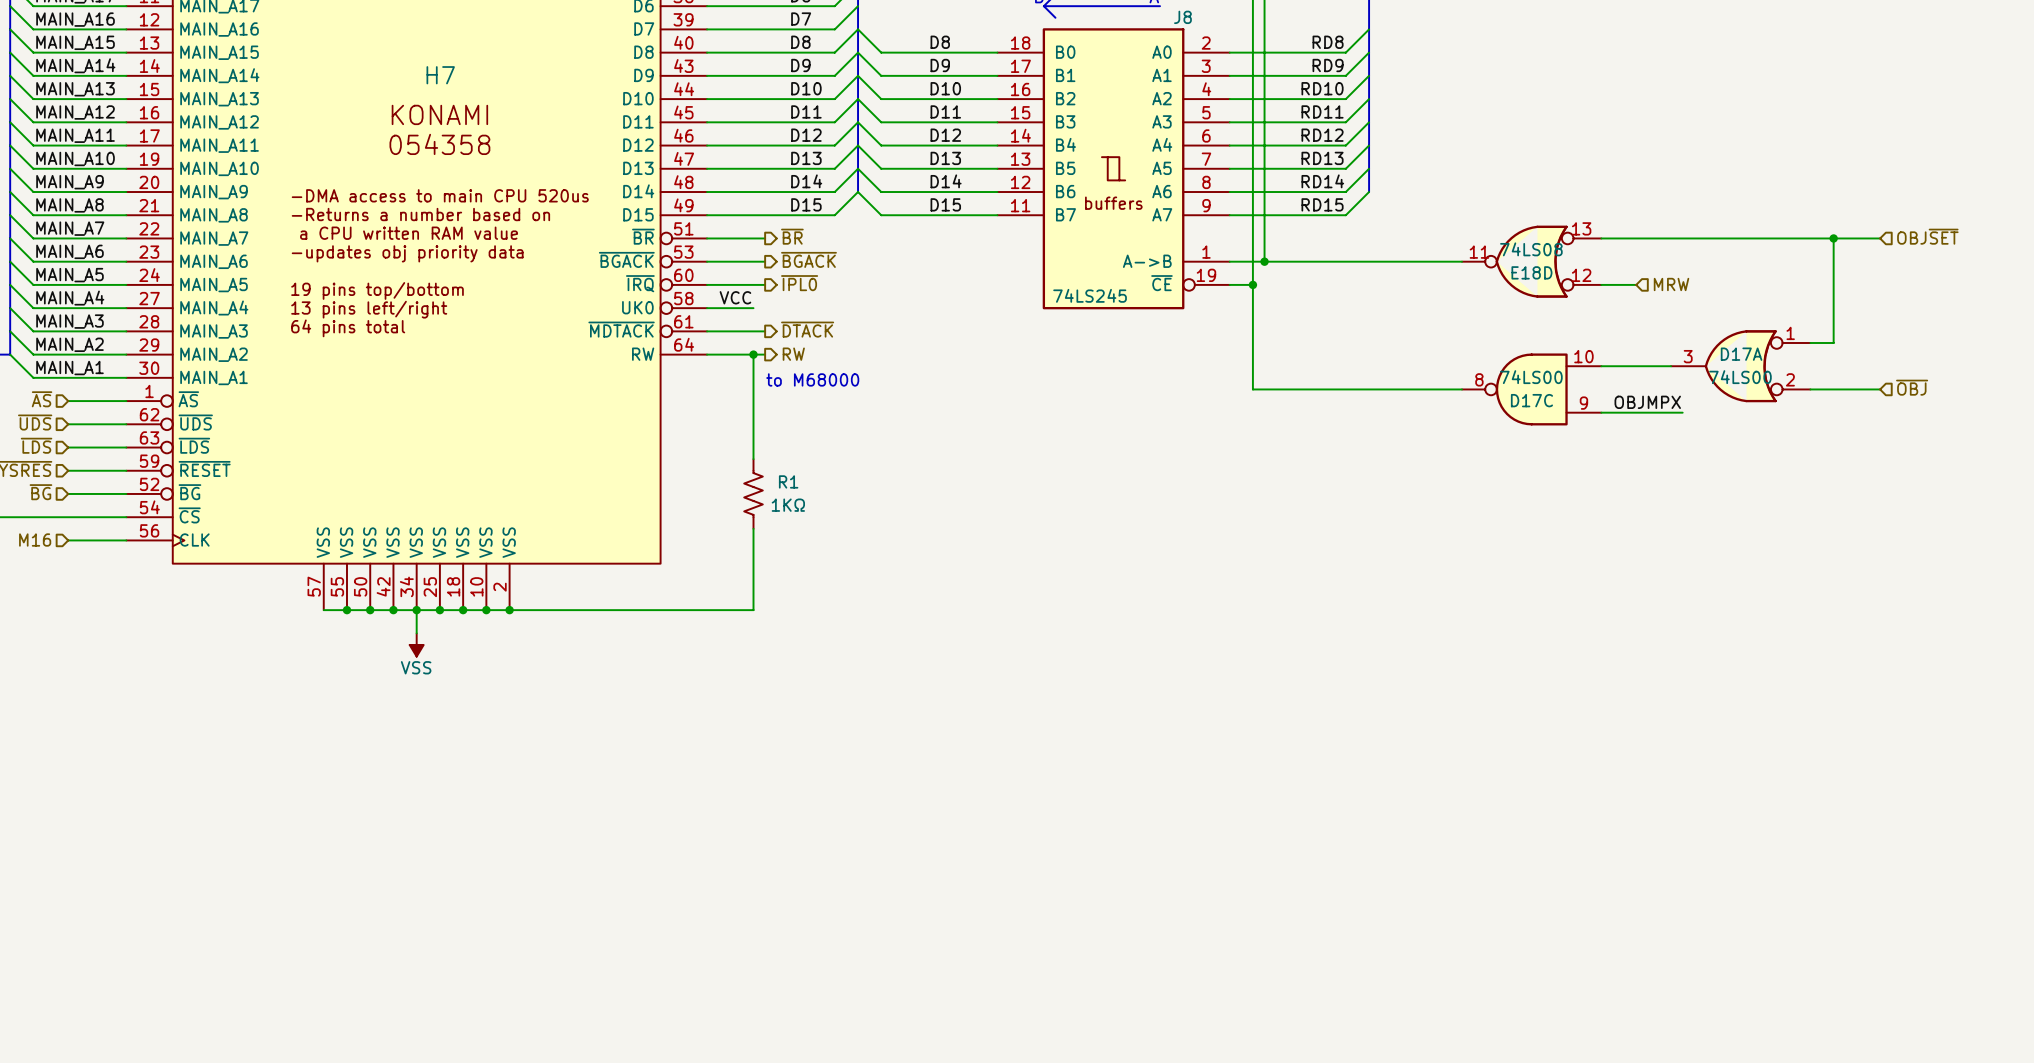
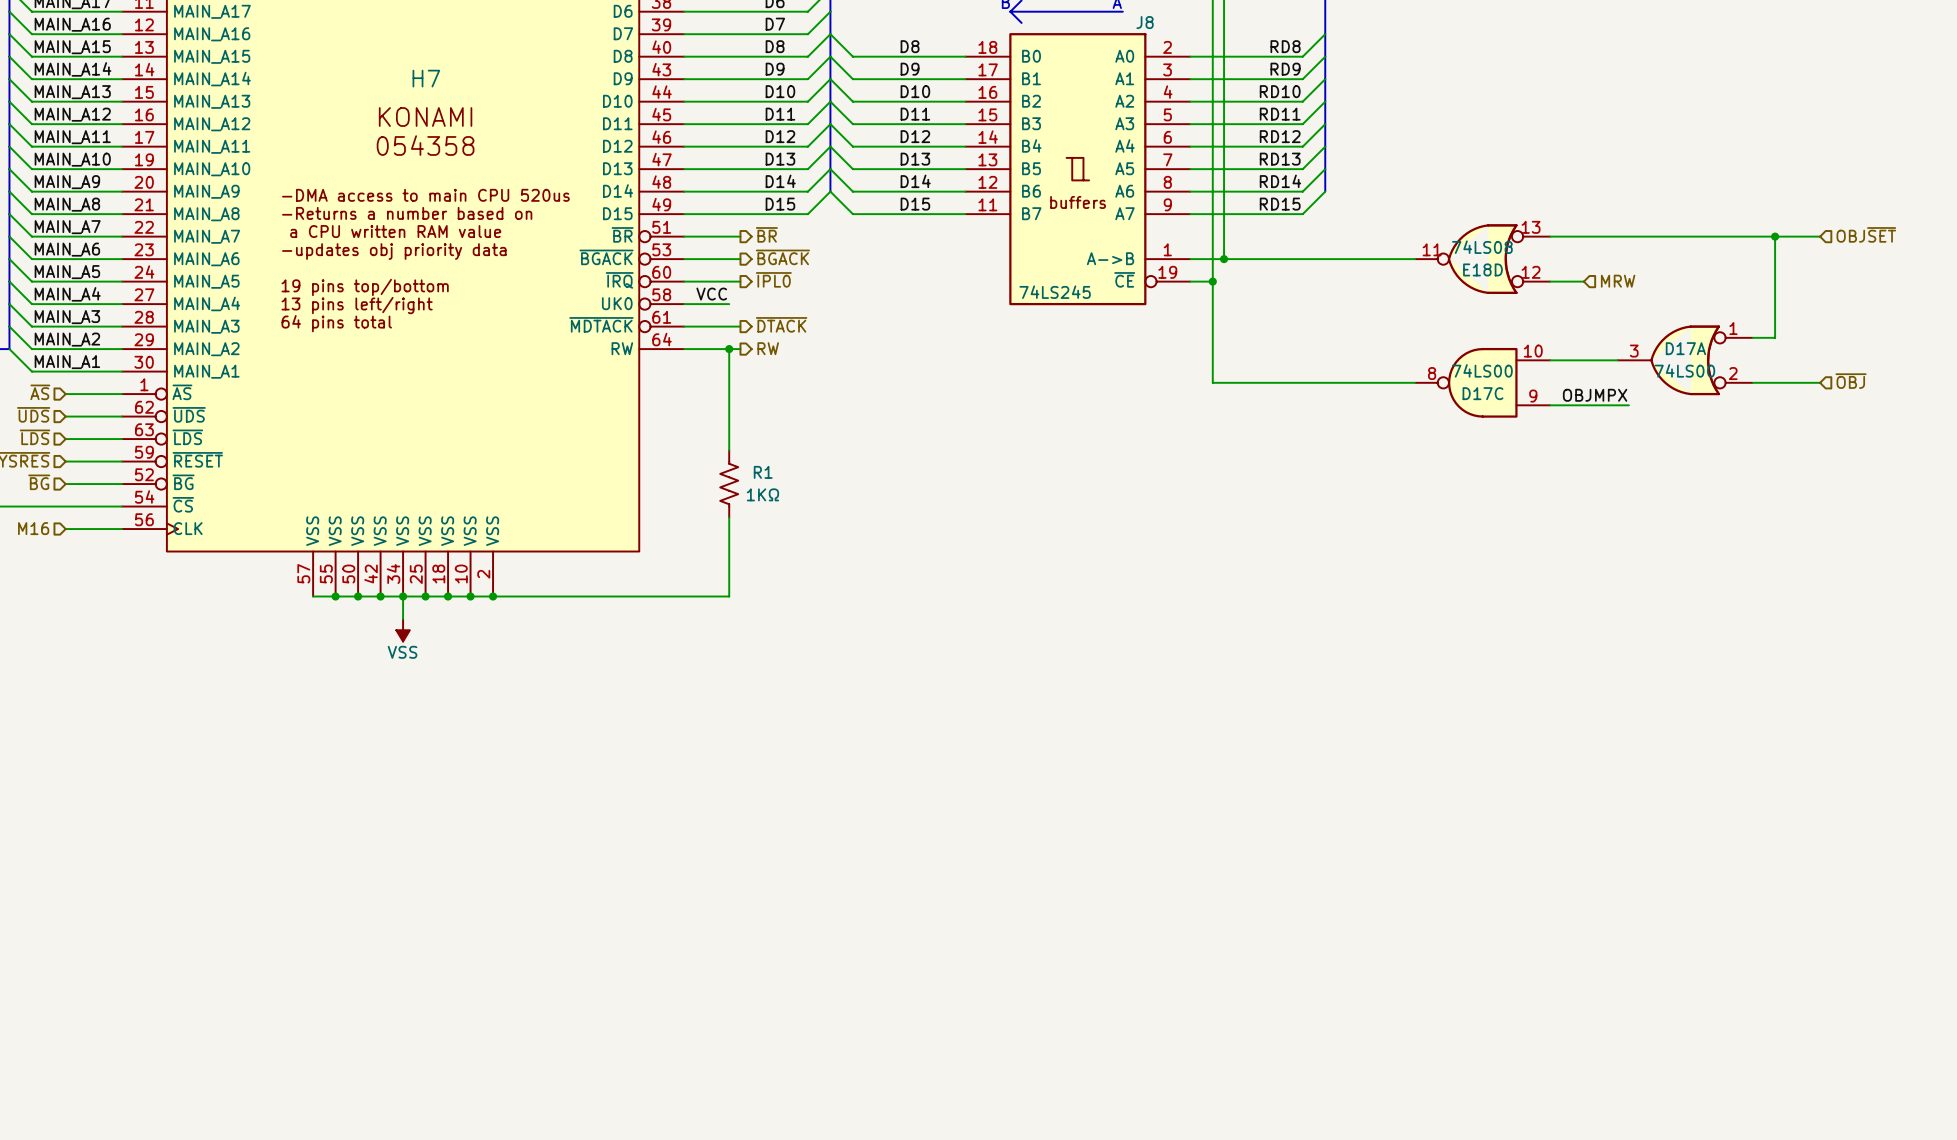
text: to M68000 (812, 379) -> none

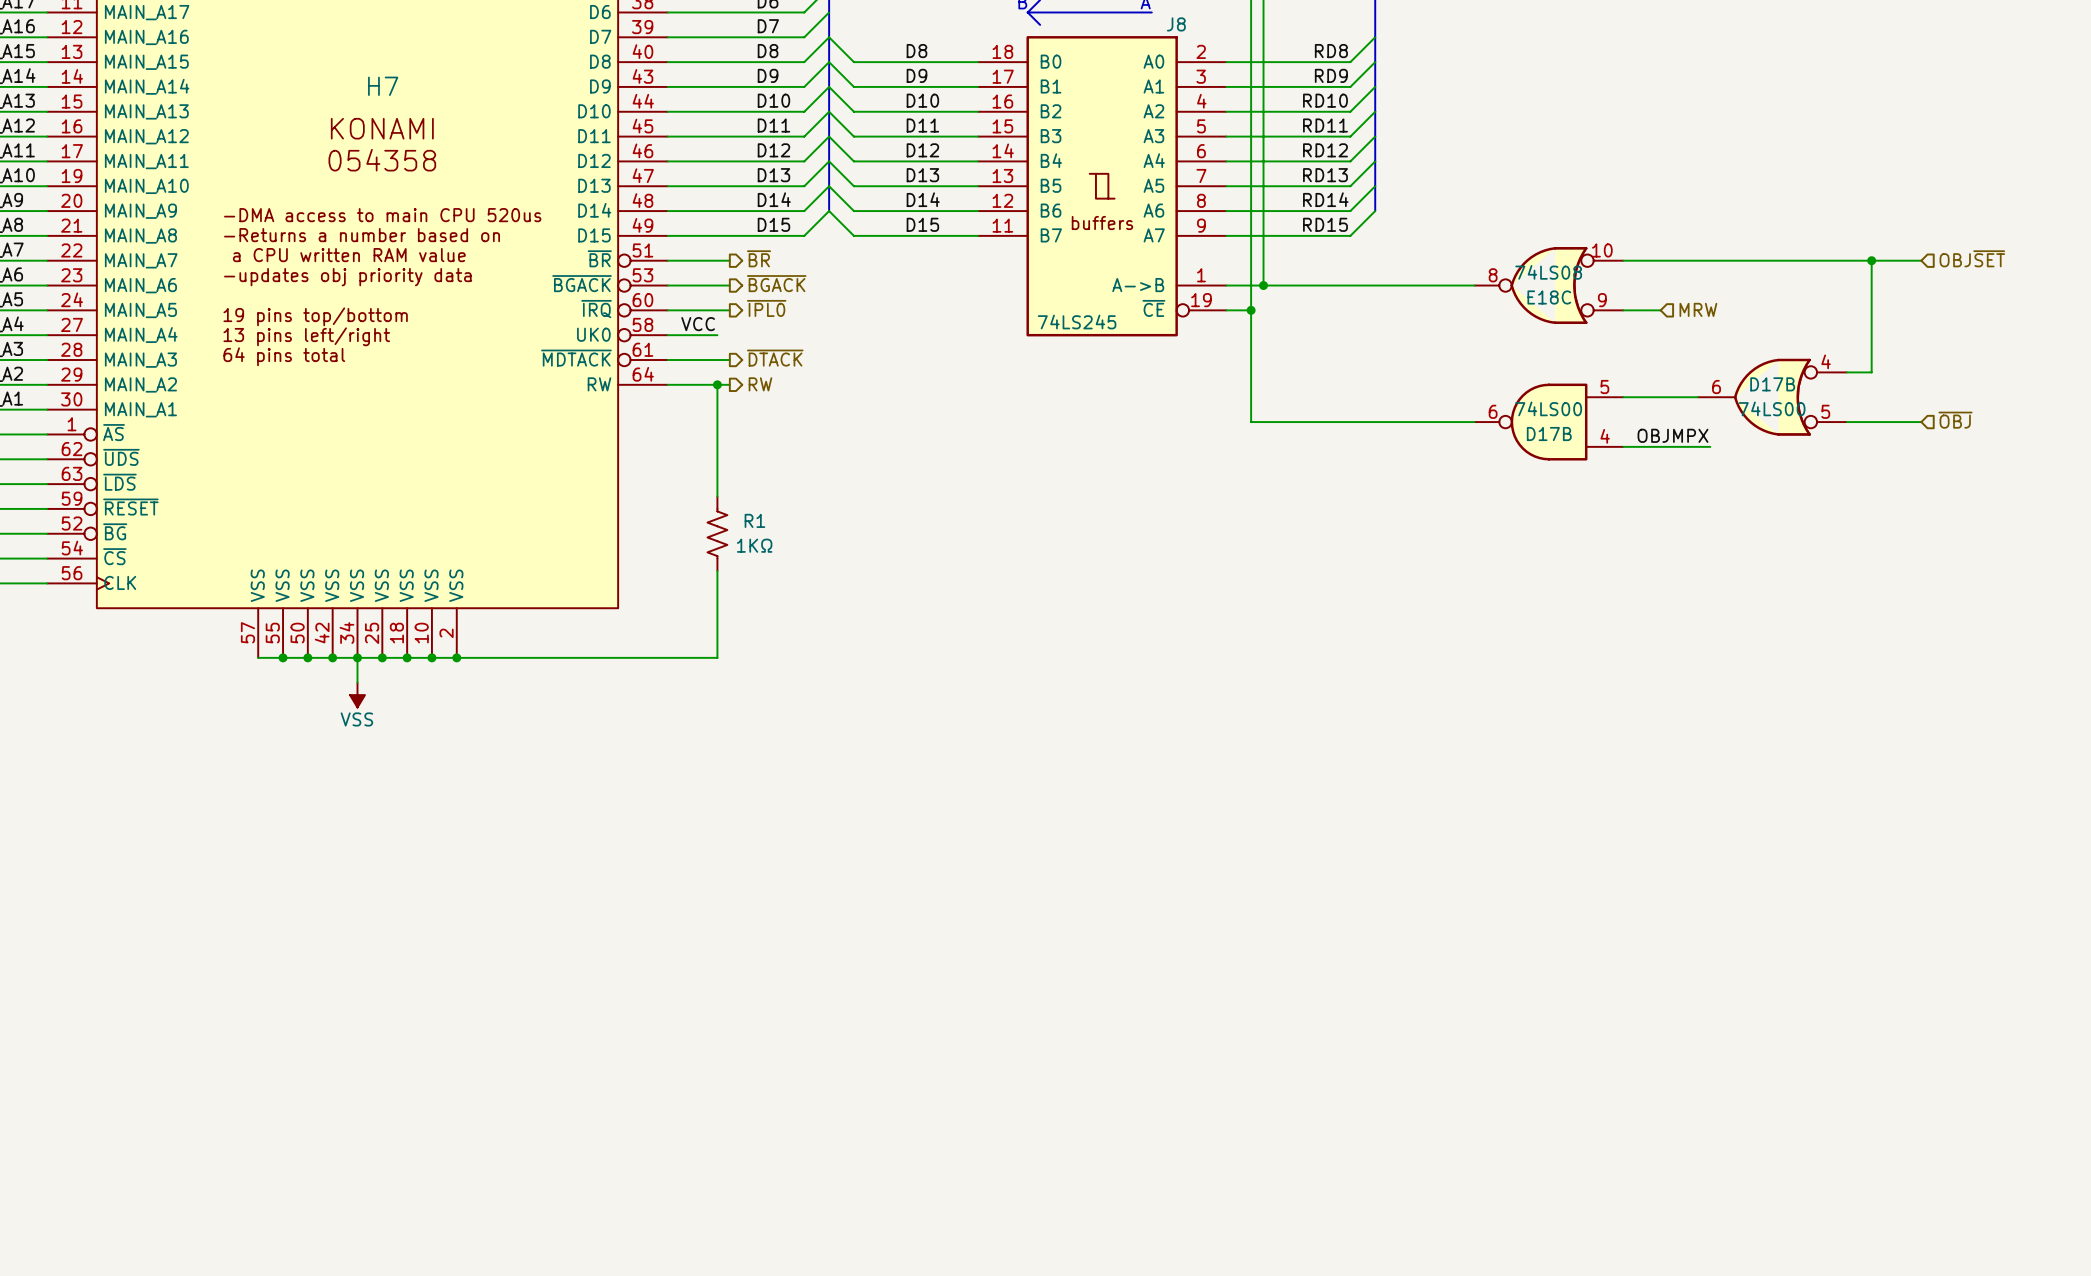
E18D pin number: 13 (1531, 227) -> 10 (1602, 250)
E18D pin number: 11 (1432, 249) -> 8 (1493, 275)
E18D name: E18D (1482, 269) -> E18C (1549, 297)
E18D pin number: 12 (1531, 272) -> 9 (1602, 300)
D17A pin number: 1 (1733, 328) -> 4 (1826, 361)
D17A name: D17A (1685, 348) -> D17B (1772, 384)
D17C pin number: 10 (1533, 351) -> 5 (1604, 386)
D17A pin number: 3 (1634, 351) -> 6 (1716, 386)
D17C pin number: 8 (1432, 373) -> 6 (1493, 411)
D17A pin number: 2 (1733, 373) -> 5 (1825, 411)
D17C name: D17C (1482, 393) -> D17B (1549, 434)
D17C pin number: 9 (1533, 396) -> 4 (1605, 436)

